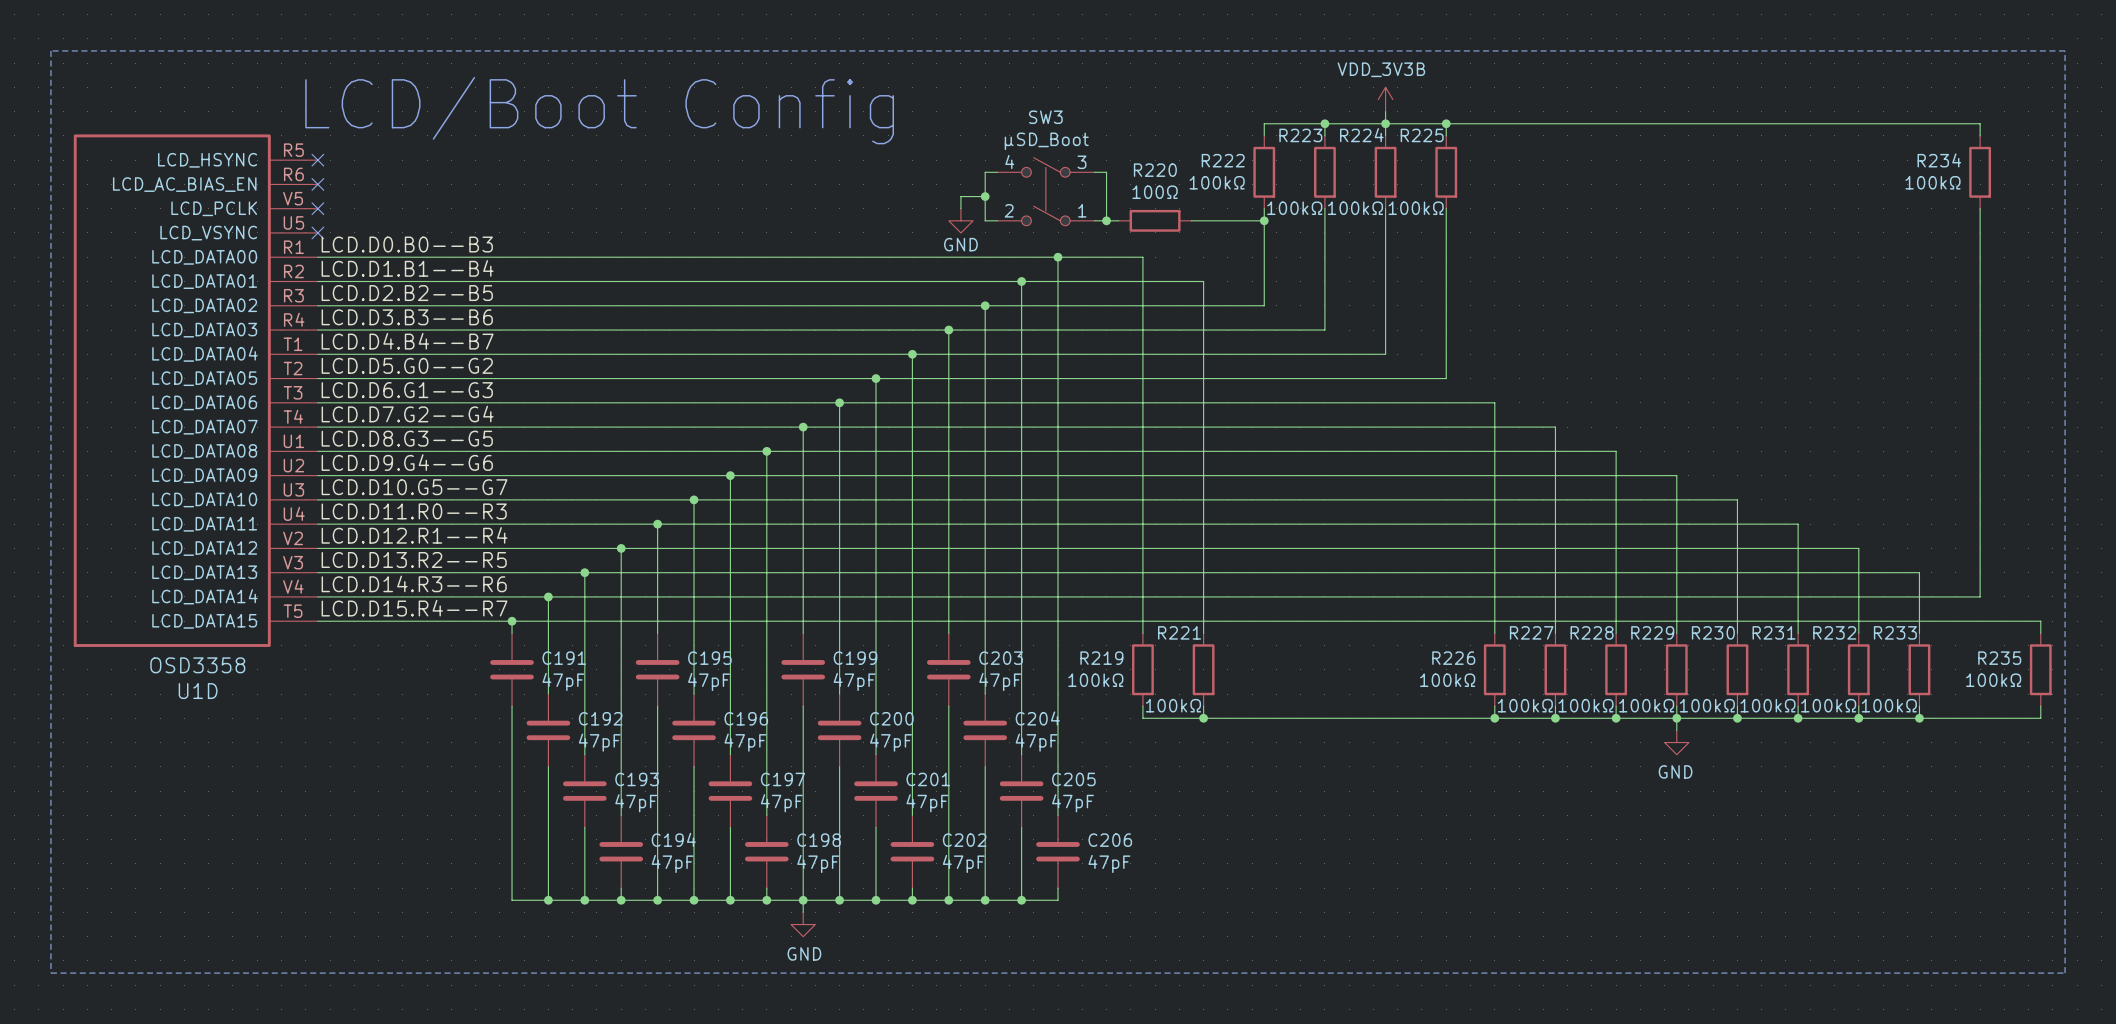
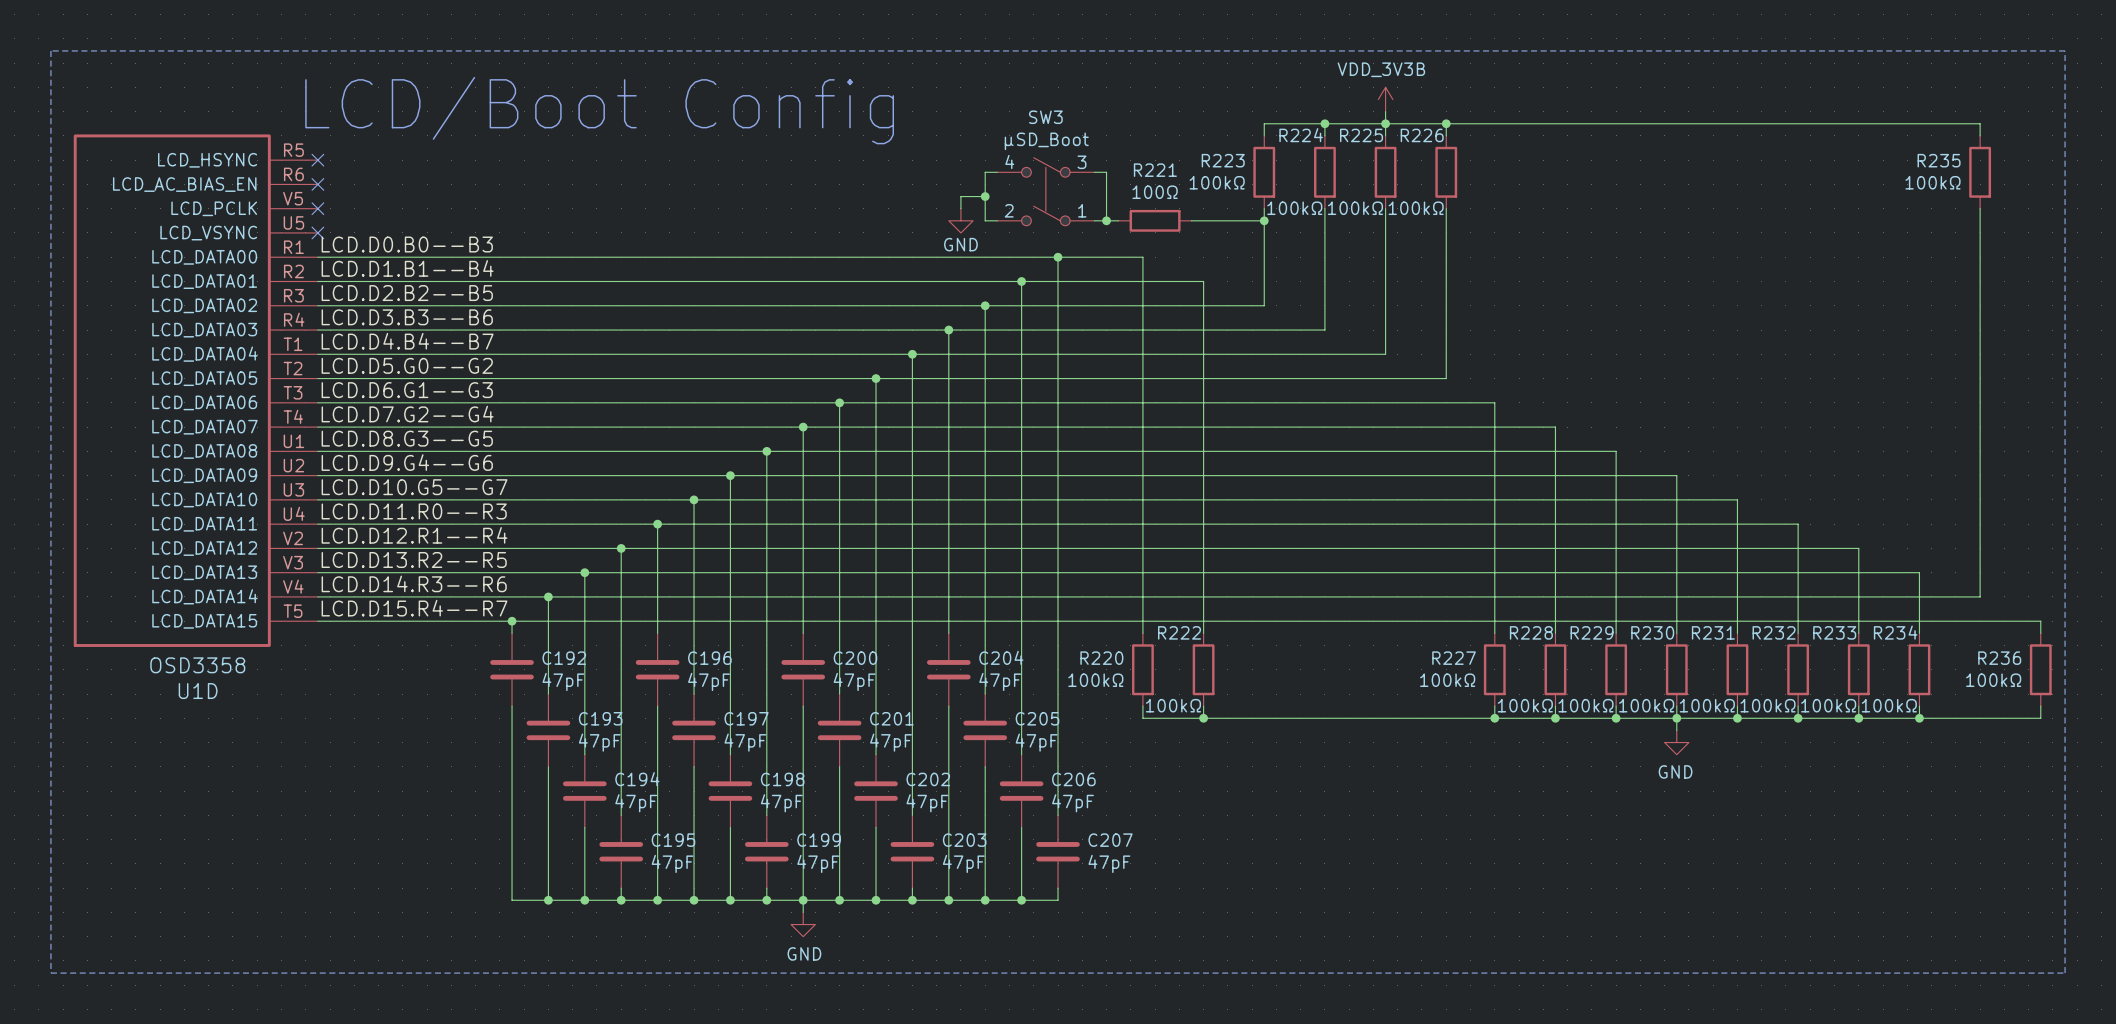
R223 name: R223 (1300, 135) -> R224 (1301, 135)
R224 name: R224 (1361, 135) -> R225 (1361, 135)
R225 name: R225 (1422, 135) -> R226 (1422, 135)
R222 name: R222 (1223, 160) -> R223 (1223, 160)
R234 name: R234 (1939, 160) -> R235 (1939, 160)
R220 name: R220 (1155, 170) -> R221 (1155, 170)
R221 name: R221 (1179, 632) -> R222 (1179, 632)
R227 name: R227 (1531, 632) -> R228 (1531, 632)
R228 name: R228 (1592, 632) -> R229 (1592, 632)
R229 name: R229 (1652, 632) -> R230 (1652, 632)
R230 name: R230 (1713, 632) -> R231 (1713, 632)
R231 name: R231 (1774, 632) -> R232 (1774, 632)
R232 name: R232 (1834, 632) -> R233 (1834, 632)
R233 name: R233 (1895, 632) -> R234 (1895, 632)
C191 name: C191 (564, 658) -> C192 (564, 658)
C195 name: C195 (709, 658) -> C196 (709, 658)
C199 name: C199 (855, 658) -> C200 (855, 658)
C203 name: C203 (1001, 658) -> C204 (1001, 657)
R219 name: R219 (1101, 658) -> R220 (1101, 658)
R226 name: R226 (1453, 658) -> R227 (1454, 658)
R235 name: R235 (1999, 658) -> R236 (1999, 658)
C192 name: C192 (600, 718) -> C193 (600, 718)
C196 name: C196 (746, 718) -> C197 (746, 718)
C200 name: C200 (891, 718) -> C201 (891, 718)
C204 name: C204 (1037, 718) -> C205 (1037, 718)
C193 name: C193 (637, 779) -> C194 (637, 779)
C197 name: C197 (782, 779) -> C198 (782, 779)
C201 name: C201 (928, 779) -> C202 (928, 779)
C205 name: C205 (1073, 779) -> C206 (1073, 779)
C194 name: C194 (673, 839) -> C195 (673, 840)
C198 name: C198 (819, 840) -> C199 (819, 840)
C202 name: C202 (964, 840) -> C203 (964, 840)
C206 name: C206 (1110, 840) -> C207 (1110, 840)

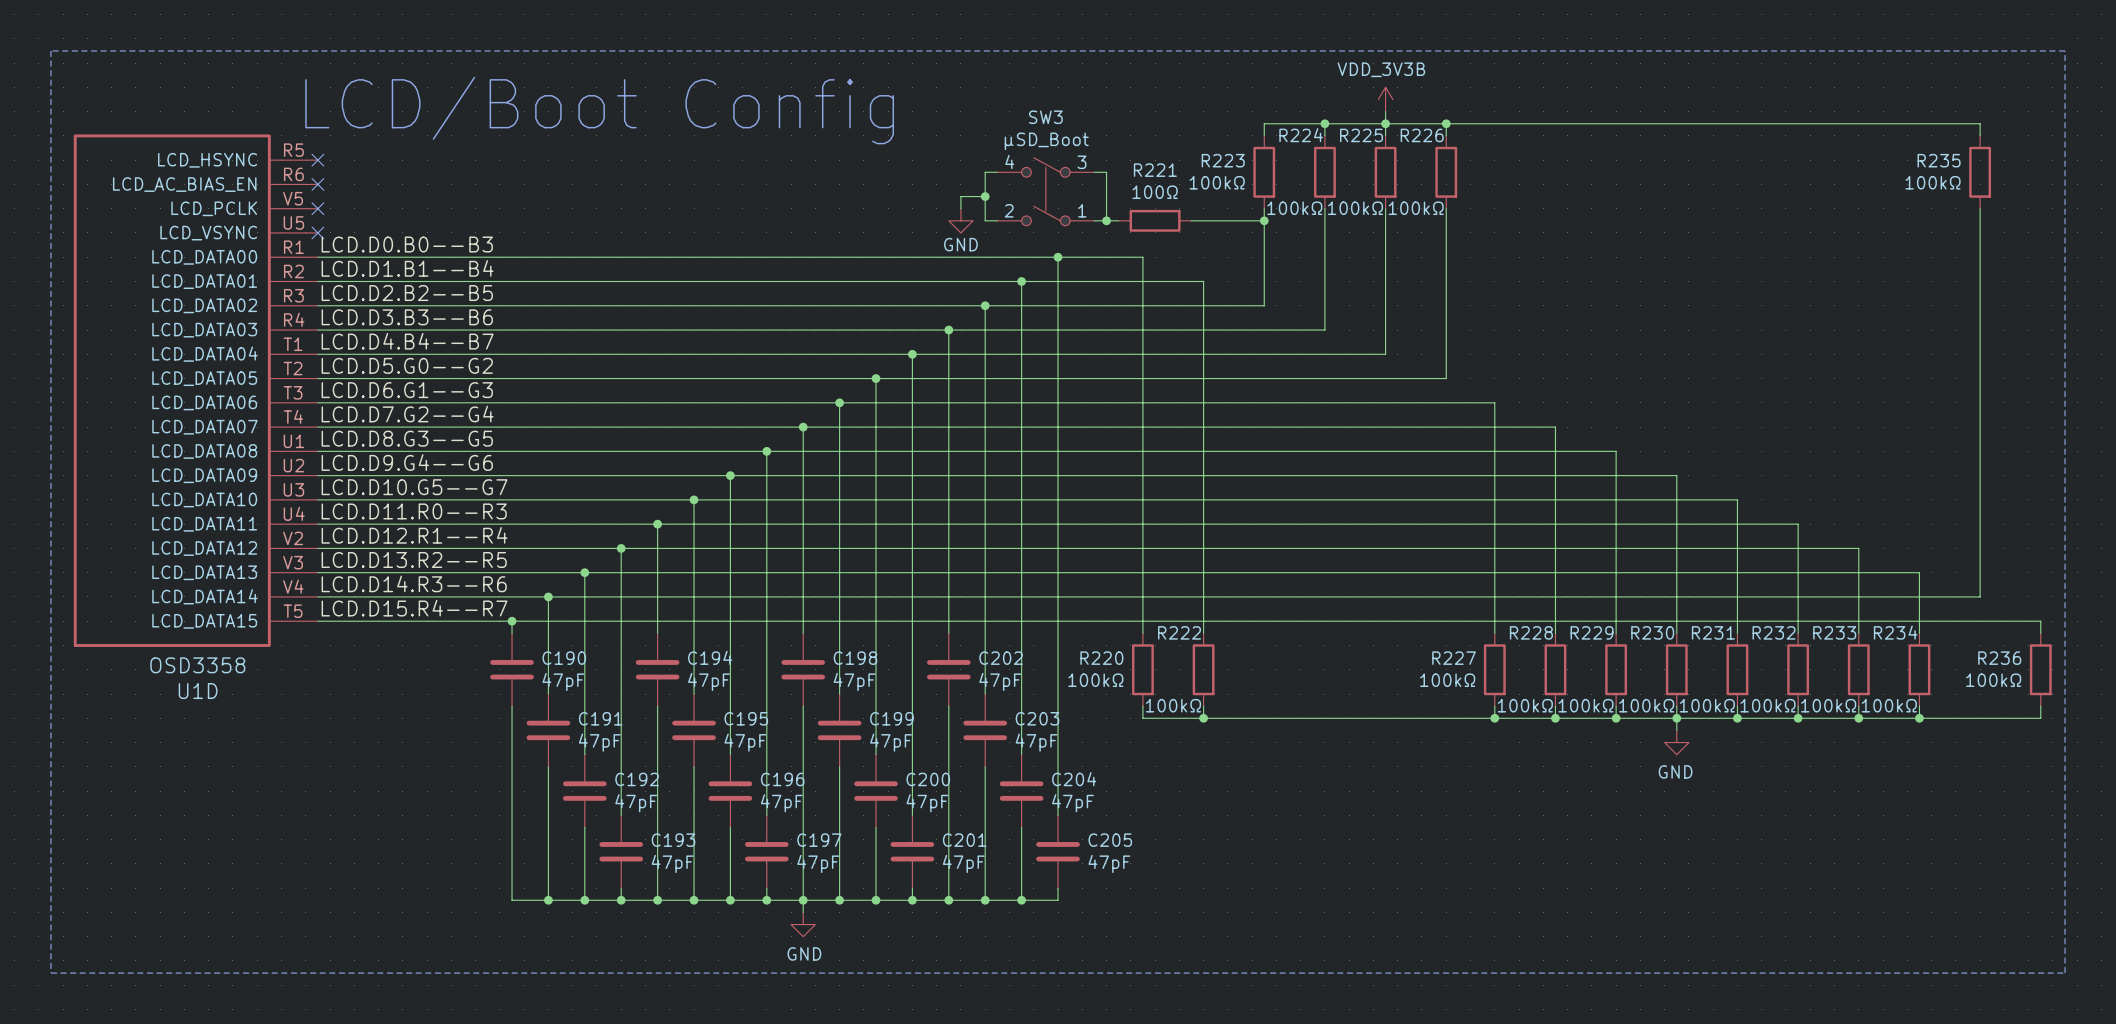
C204 name: C204 (1001, 657) -> C202 (1001, 658)
C192 name: C192 (564, 658) -> C190 (564, 658)
C196 name: C196 (709, 658) -> C194 (710, 657)
C200 name: C200 (855, 658) -> C198 (855, 658)
C193 name: C193 (600, 718) -> C191 (600, 718)
C197 name: C197 (746, 718) -> C195 (746, 718)
C201 name: C201 (891, 718) -> C199 (891, 718)
C205 name: C205 (1037, 718) -> C203 (1037, 718)
C194 name: C194 (637, 779) -> C192 (637, 779)
C198 name: C198 (782, 779) -> C196 (782, 779)
C202 name: C202 (928, 779) -> C200 (928, 779)
C206 name: C206 (1073, 779) -> C204 (1074, 779)
C195 name: C195 (673, 840) -> C193 (673, 840)
C199 name: C199 (819, 840) -> C197 (819, 840)
C203 name: C203 (964, 840) -> C201 (964, 840)
C207 name: C207 (1110, 840) -> C205 (1110, 840)

